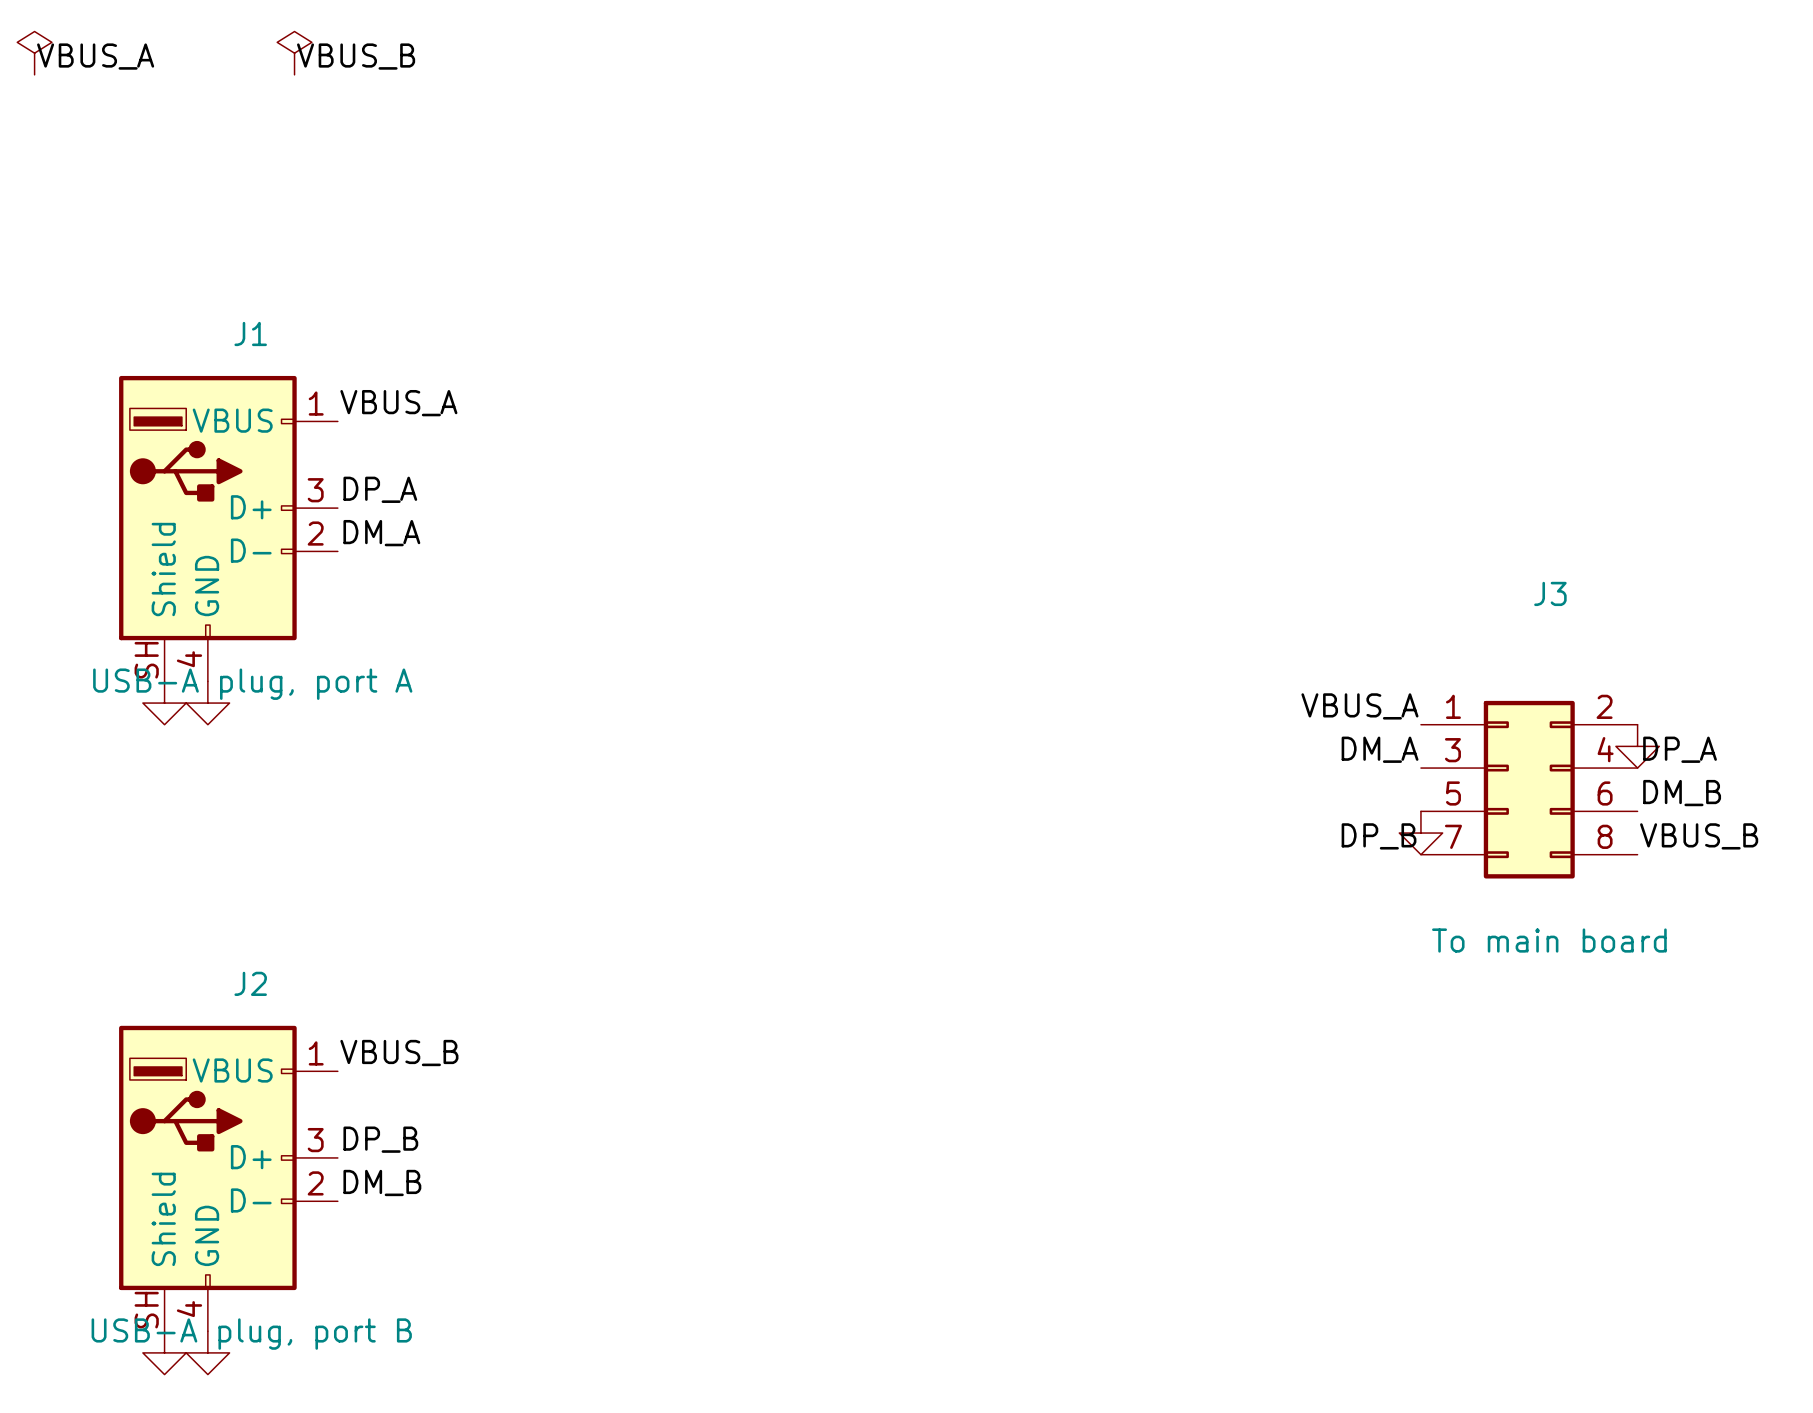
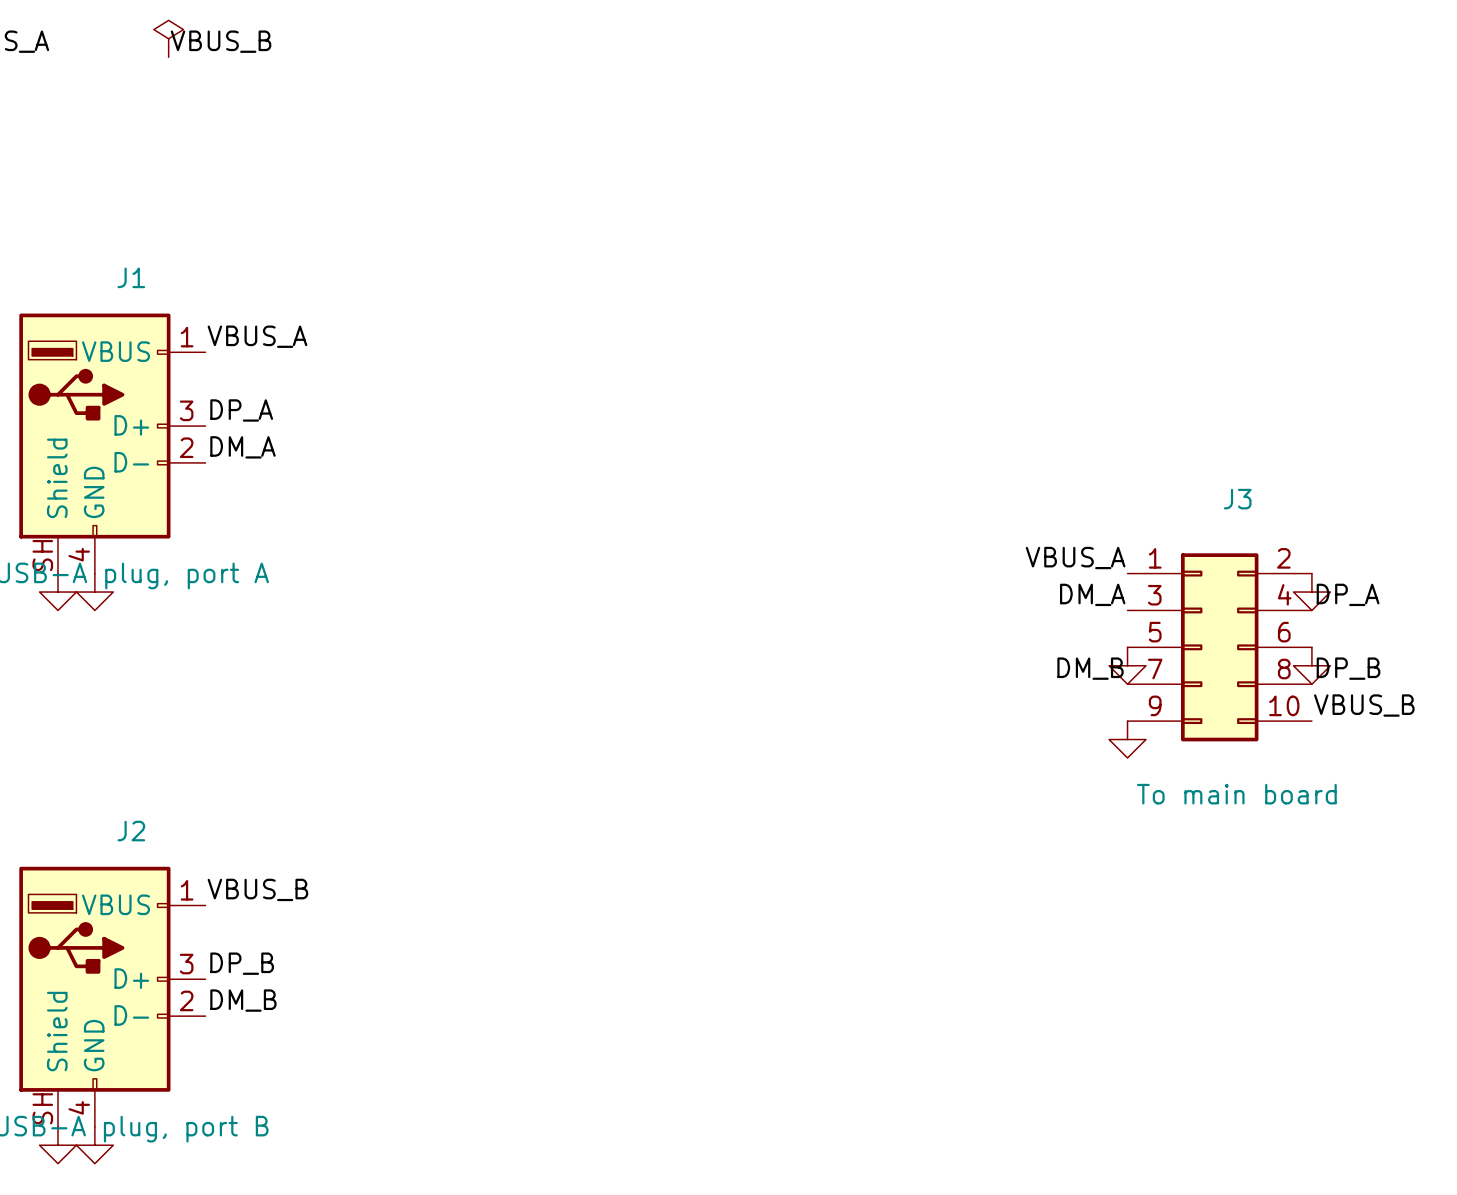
label: none -> VBUS_A (1075, 558)
J3 symbol: [1420, 700, 1638, 879] -> [1127, 553, 1312, 742]
power symbol: none -> (1311, 592)
label: VBUS_A (1359, 706) -> DM_A (1092, 594)
power symbol: (1637, 746) -> none
label: DM_A (1380, 749) -> none
label position: DP_A (1680, 749) -> DP_A (1348, 594)
power symbol: none -> (1127, 665)
power symbol: none -> (1311, 665)
label: none -> DM_B (1090, 668)
label: DM_B (1682, 793) -> DP_B (1348, 668)
power symbol: (1420, 833) -> none
label: DP_B (1379, 836) -> none
power symbol: none -> (1127, 739)

